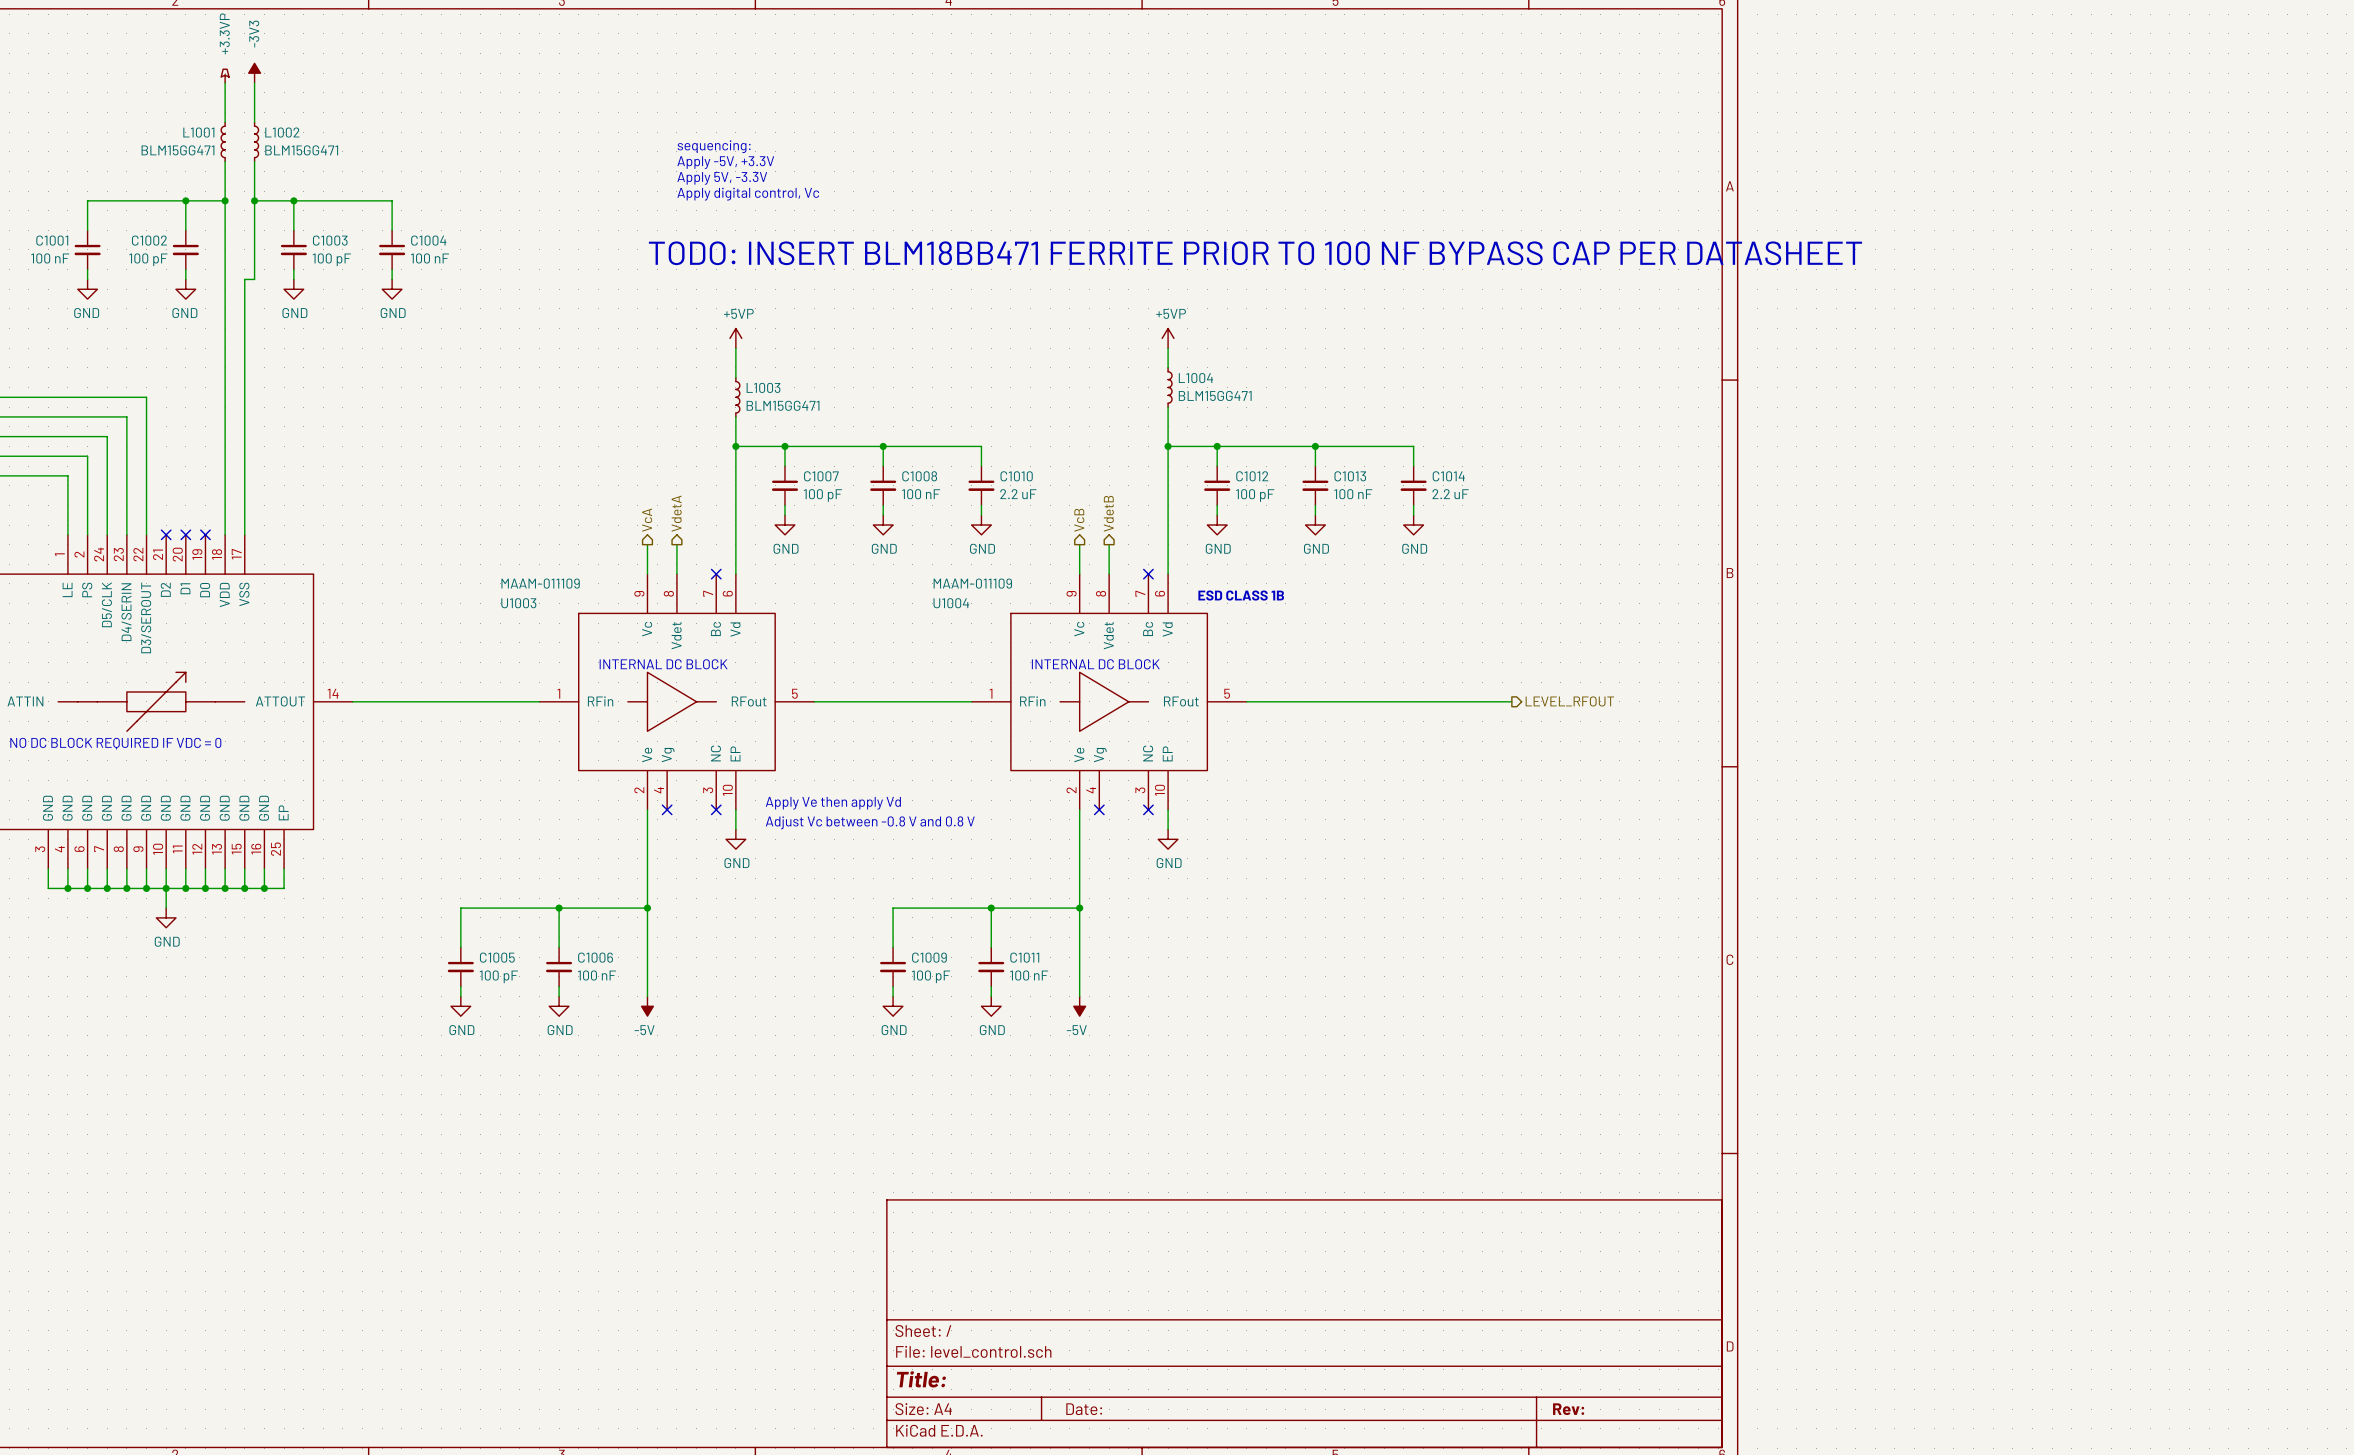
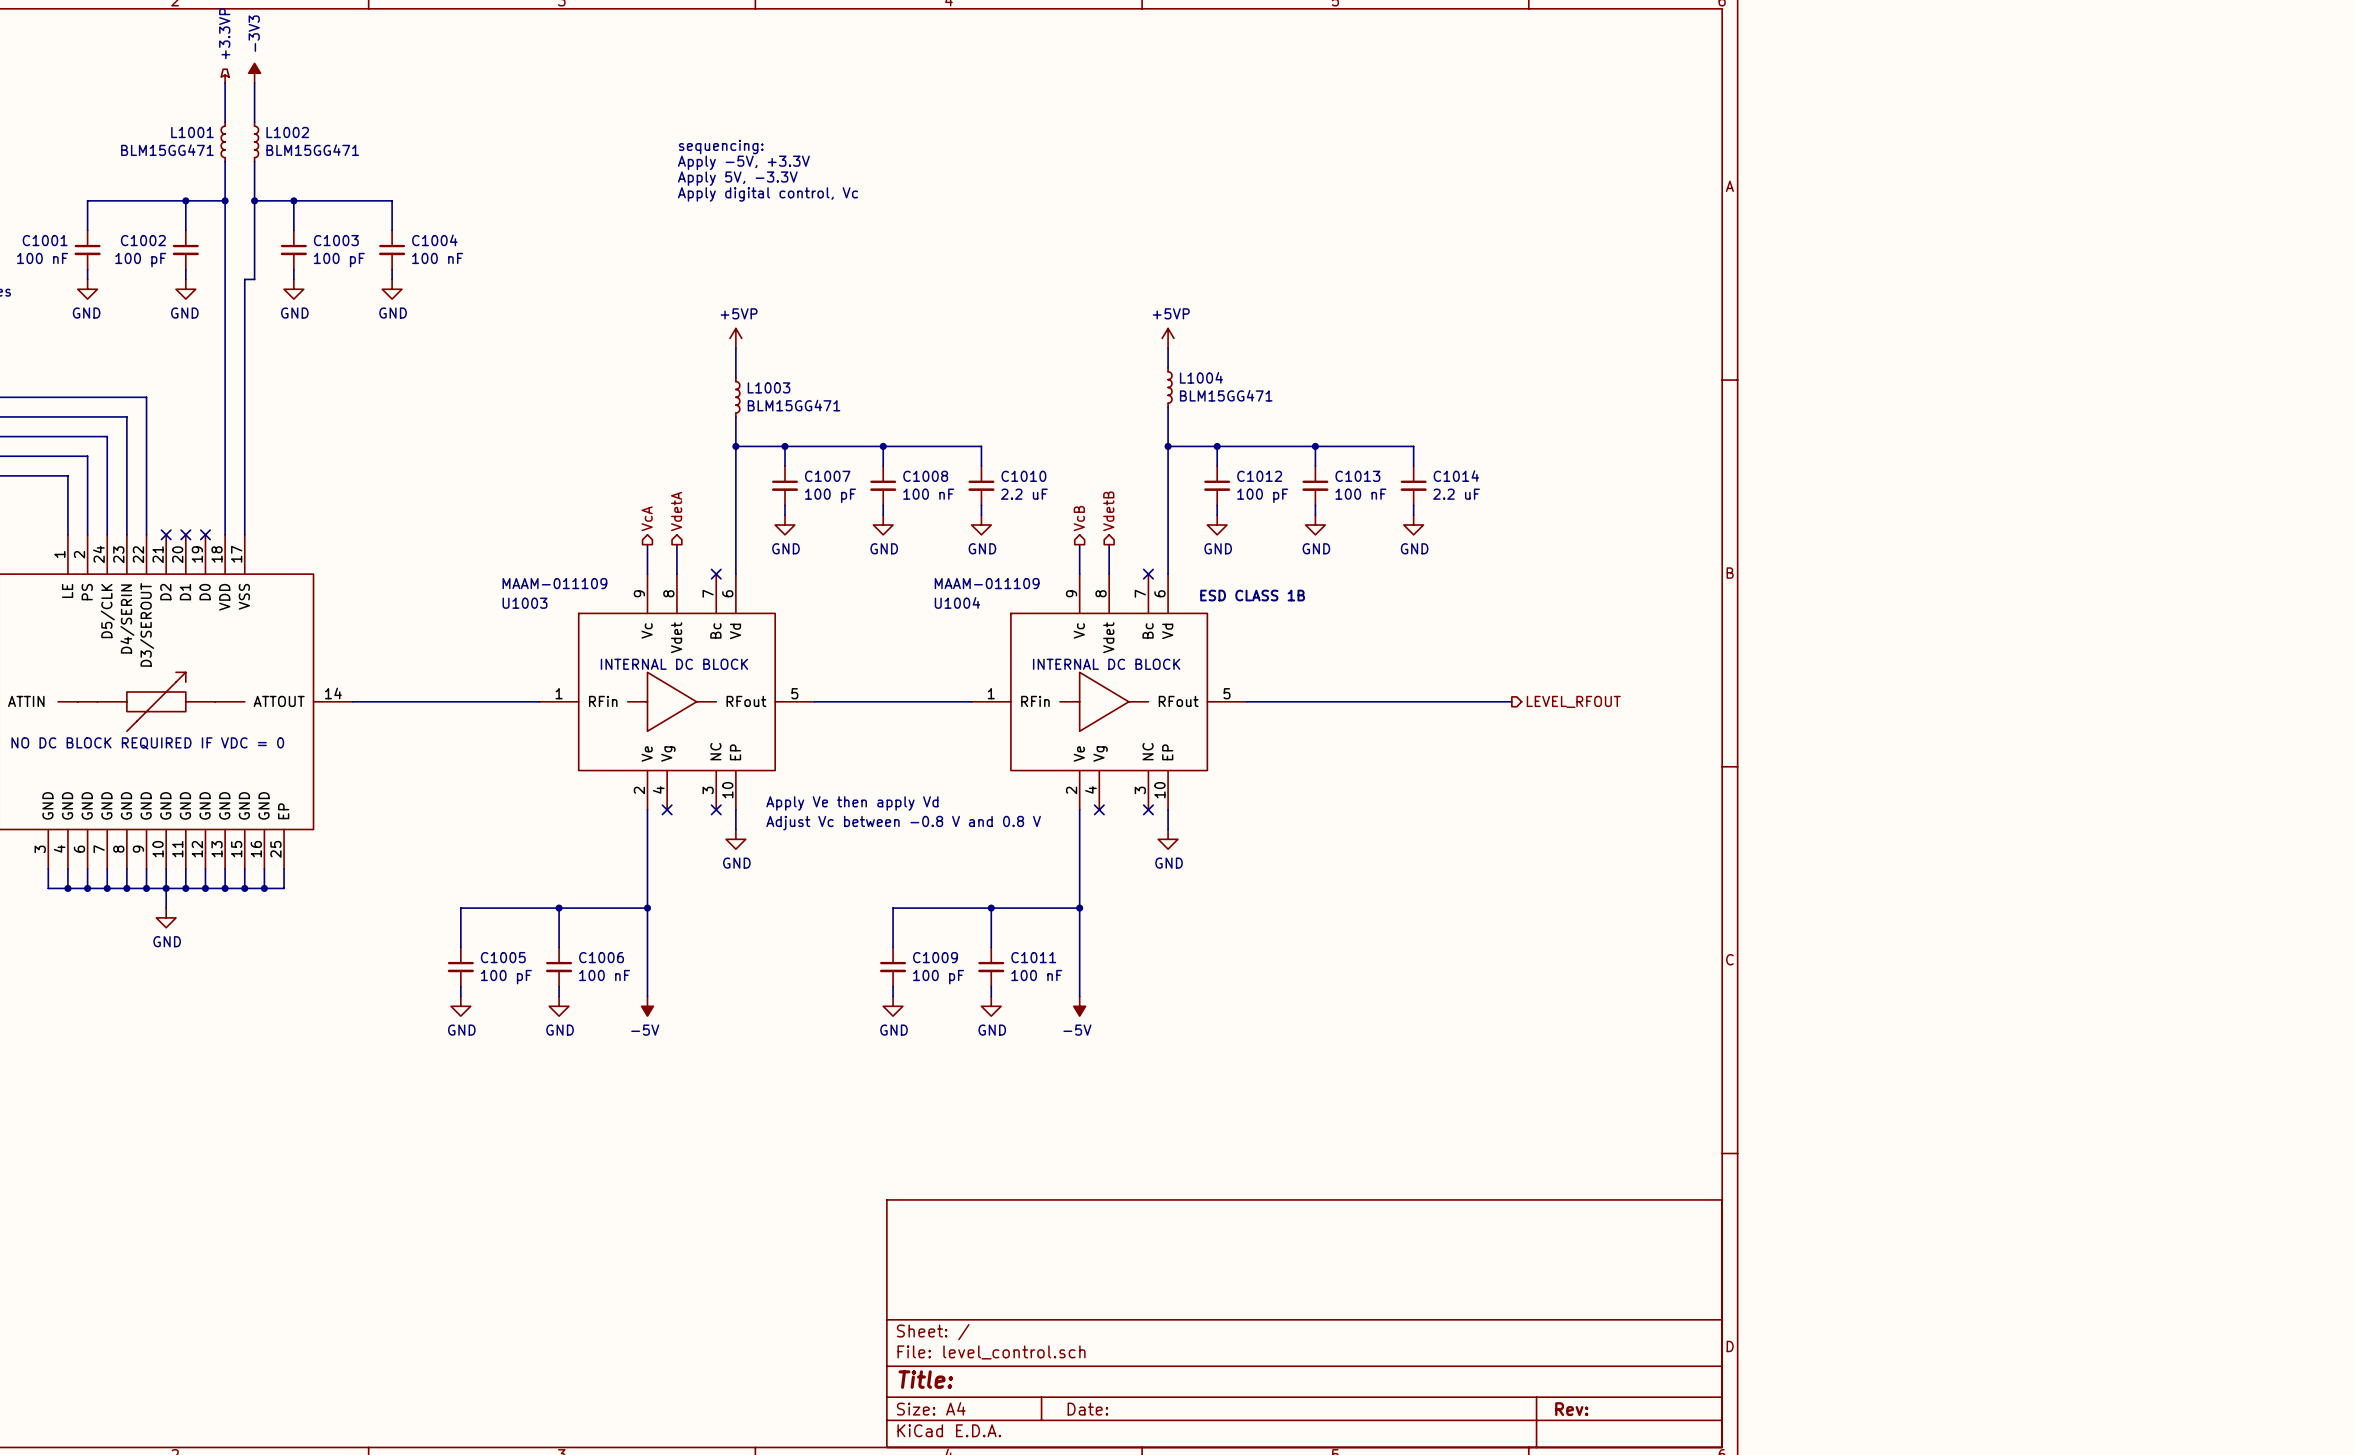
text: TODO: INSERT BLM18BB471 FERRITE PRIOR TO 100 NF BYPASS CAP PER DATASHEET (1255, 253) -> none

